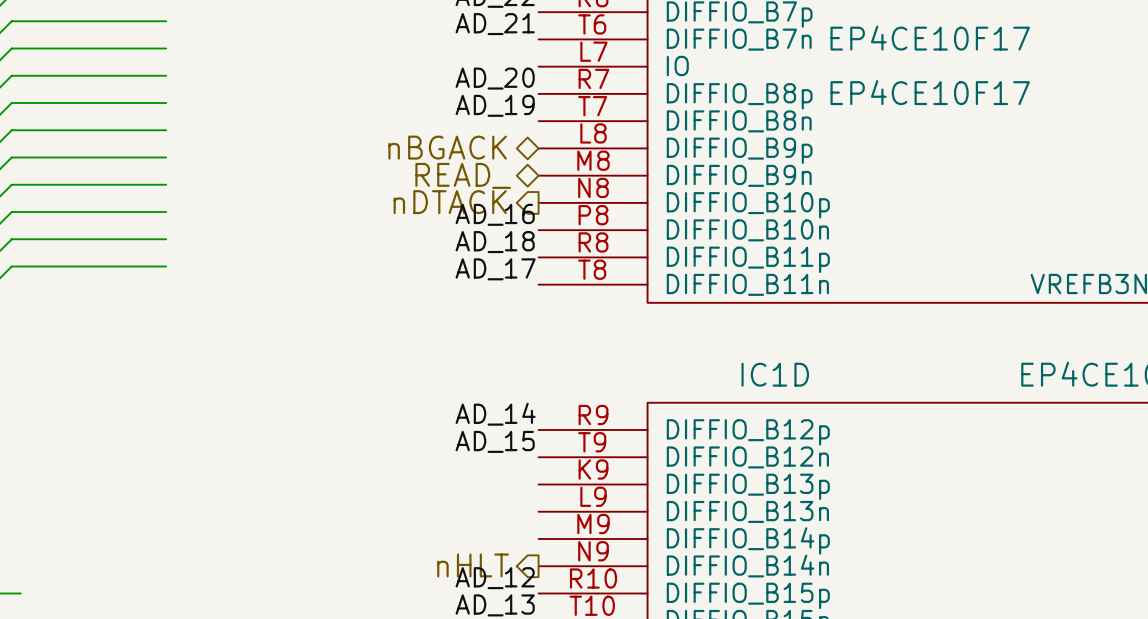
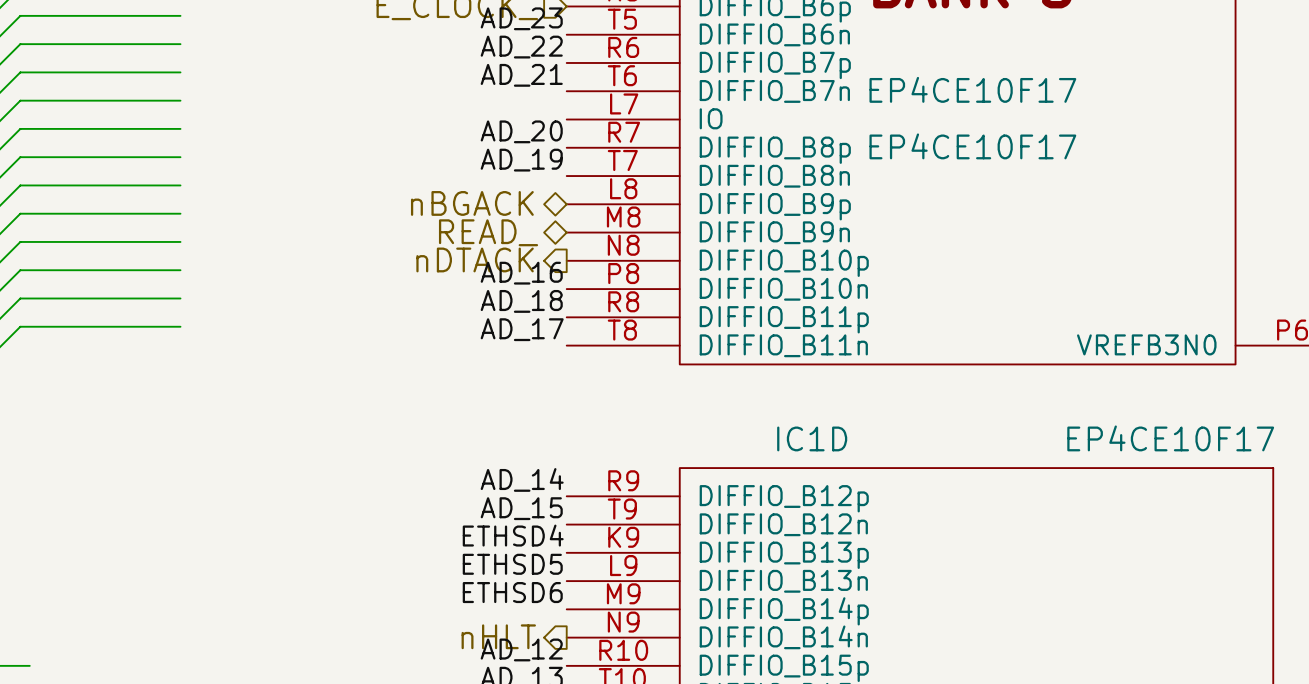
label: none -> ETHSD4 (513, 535)
label: none -> ETHSD5 (512, 564)
label: none -> ETHSD6 (512, 592)

